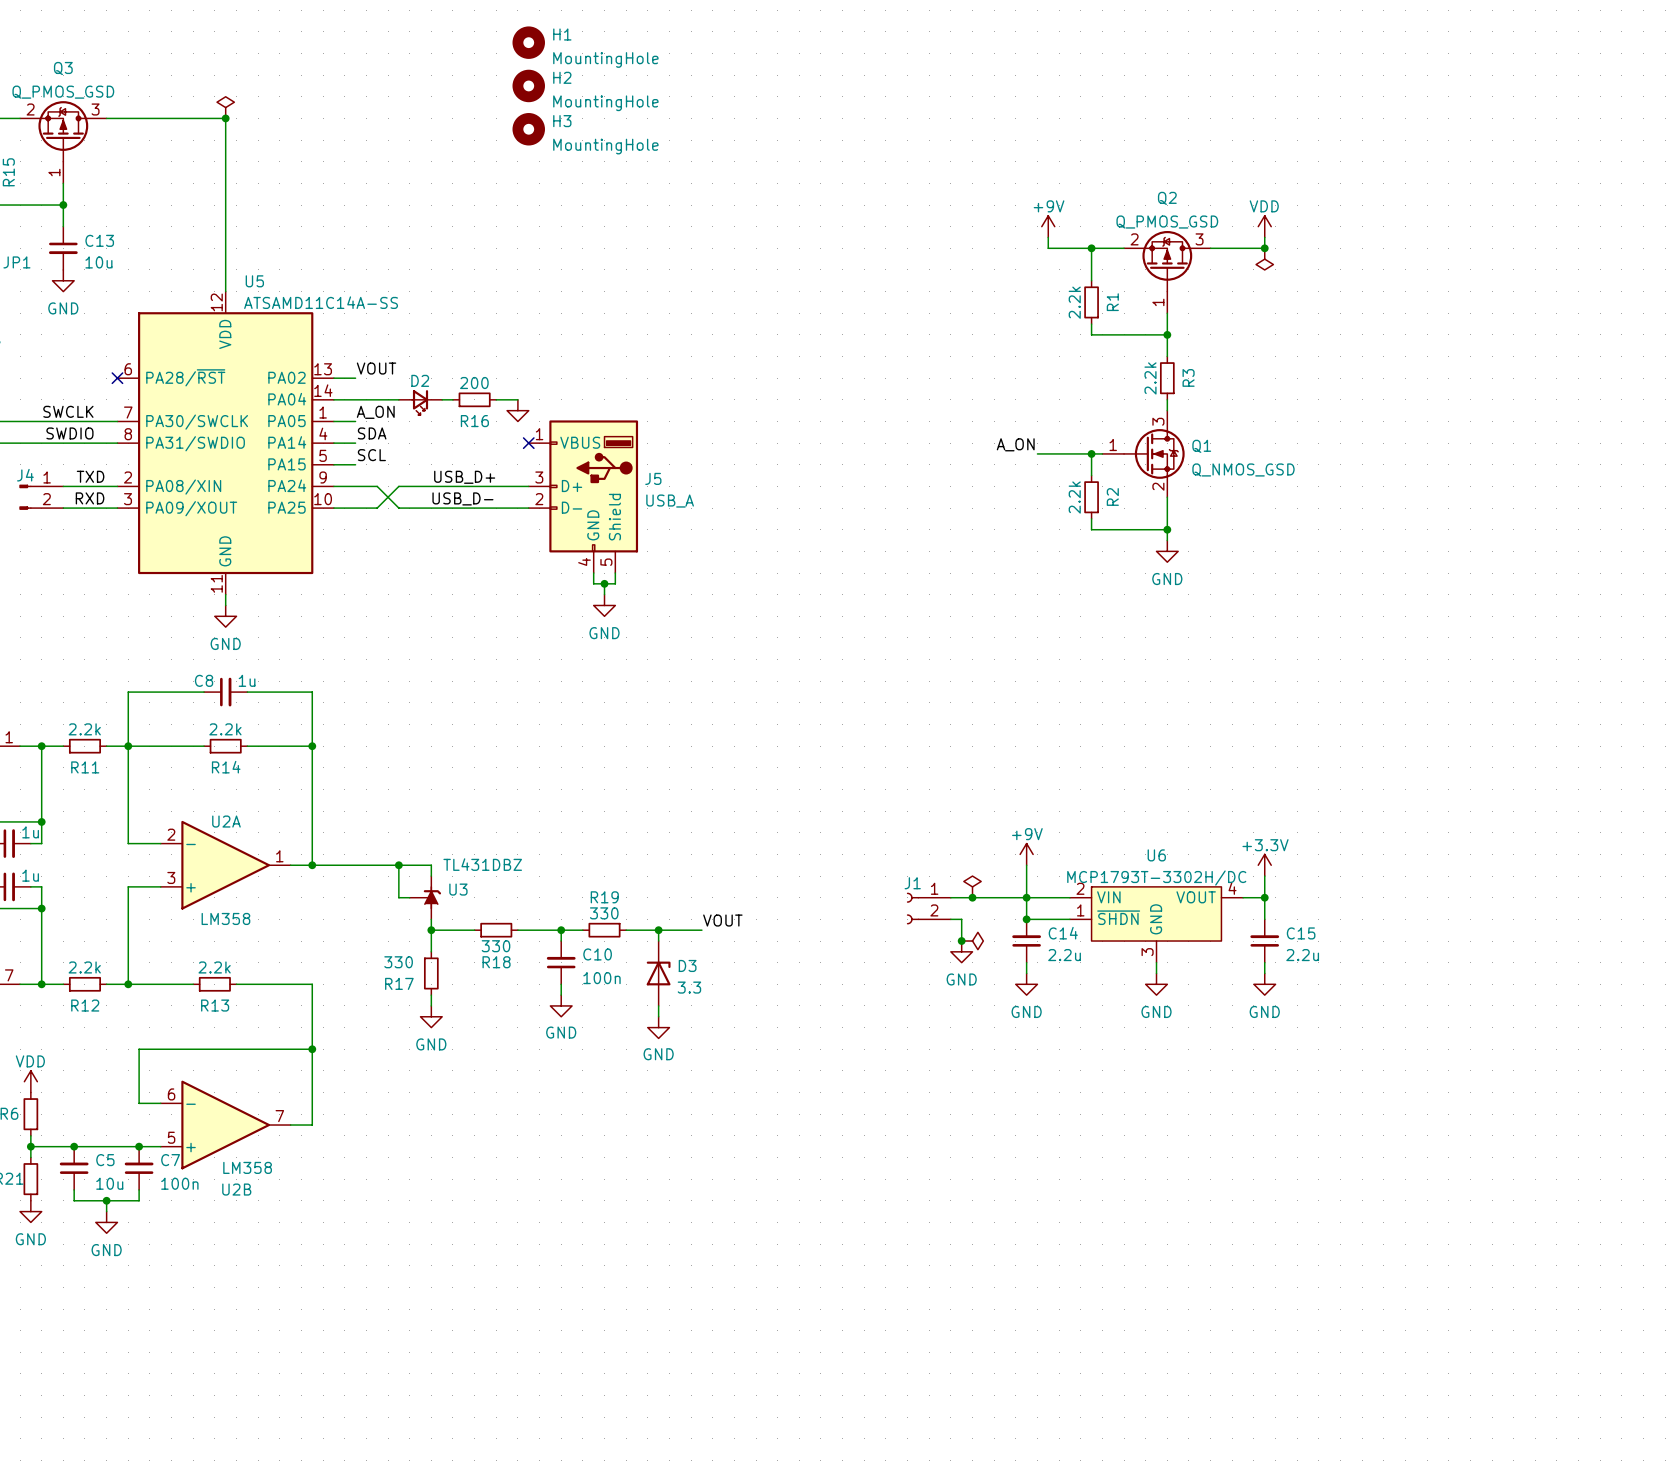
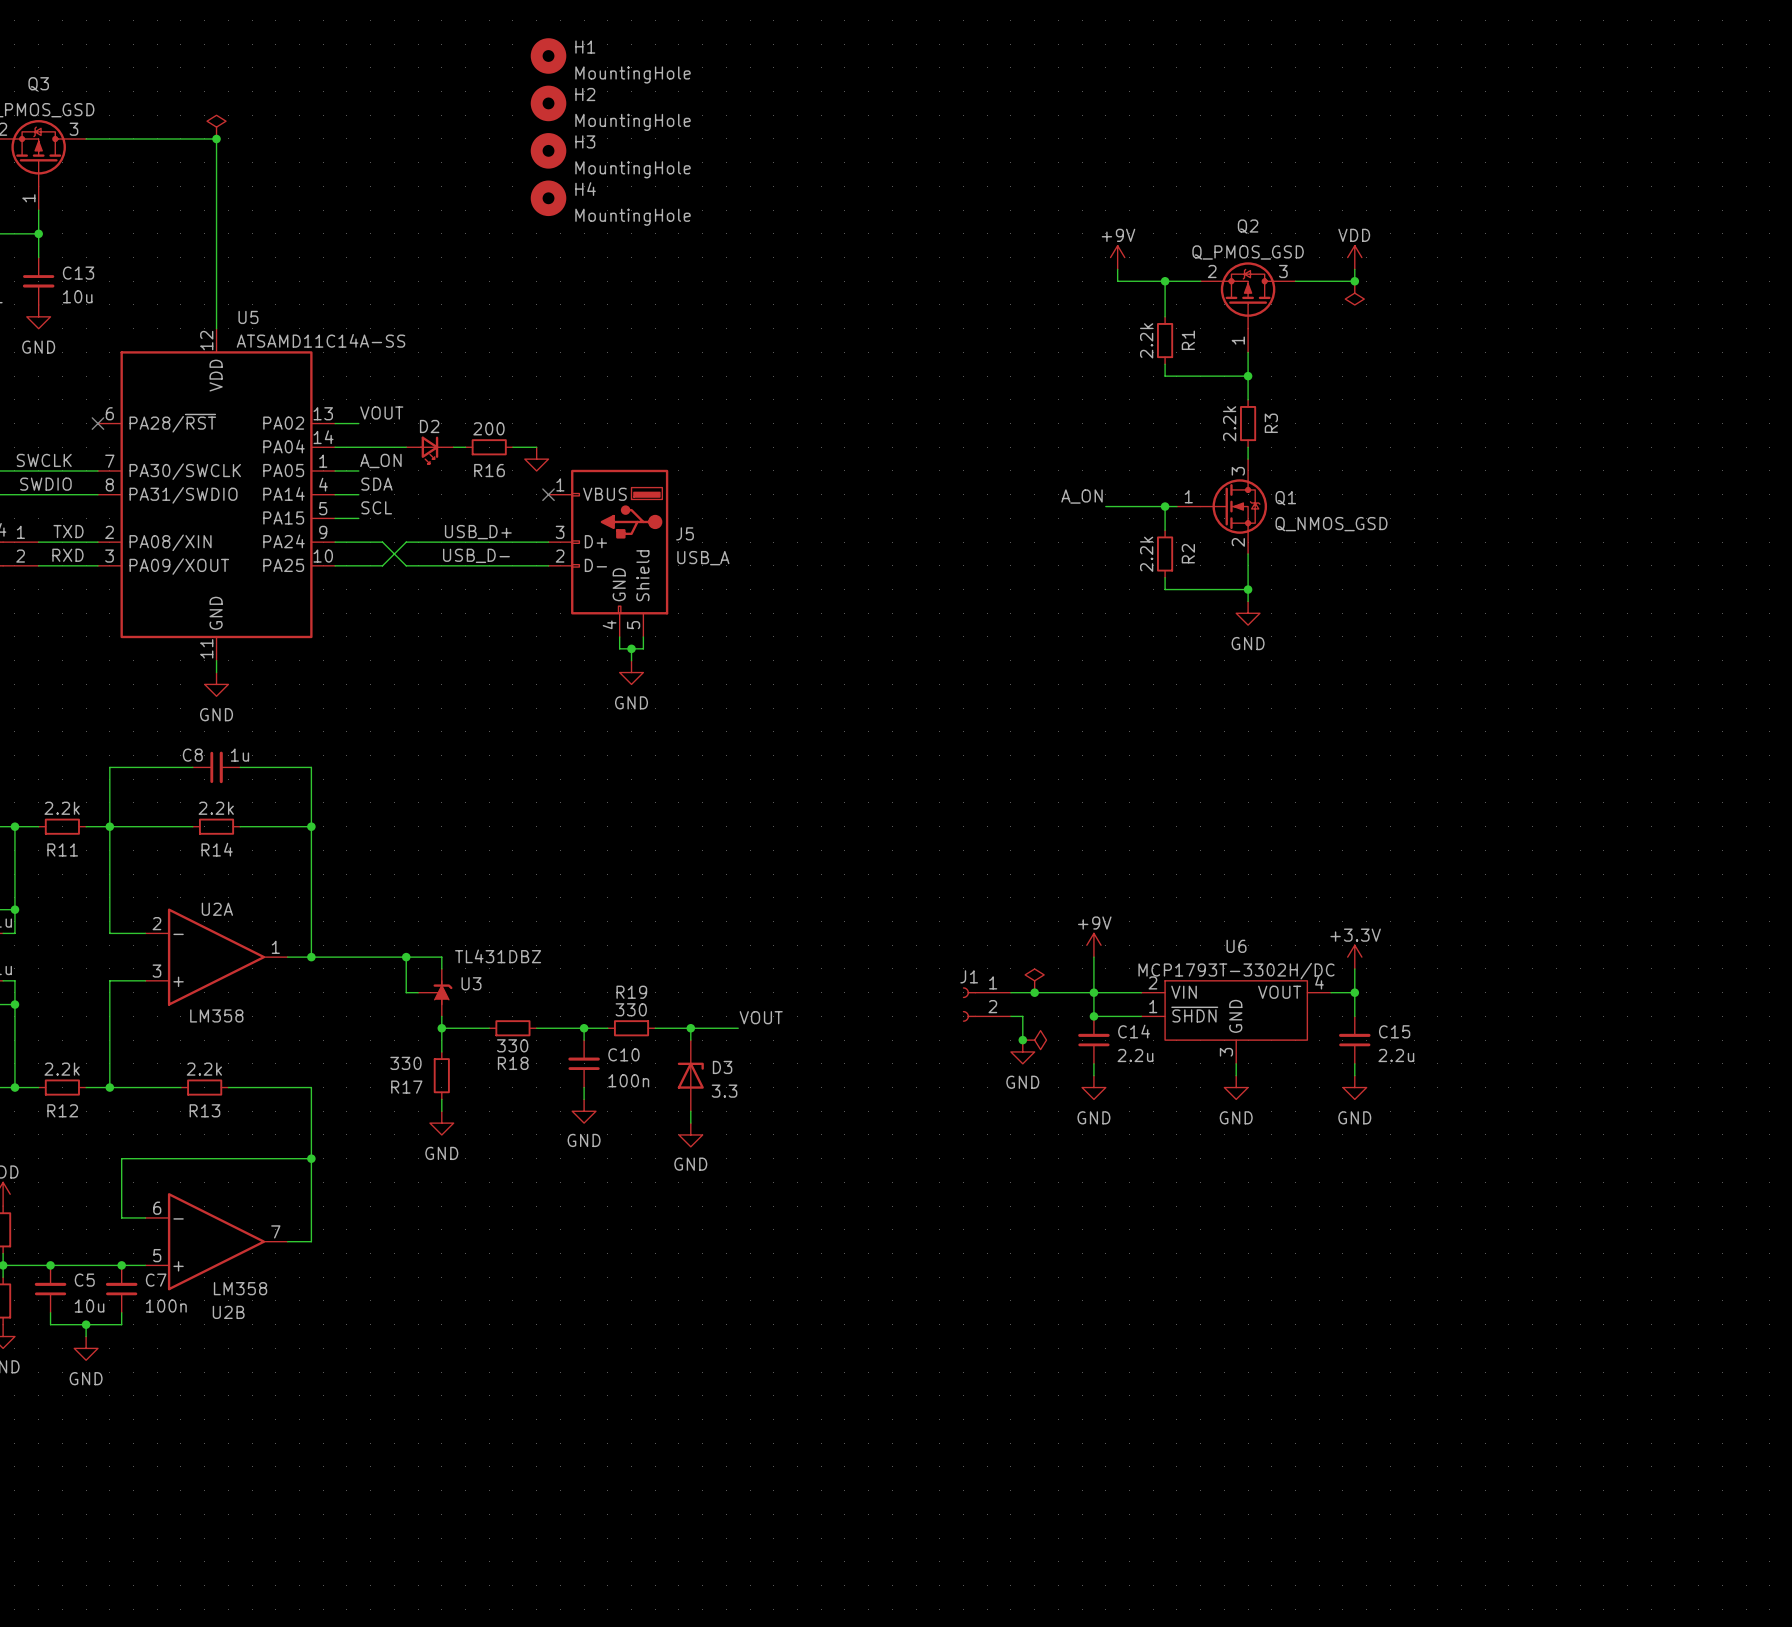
H4: none -> MountingHole (548, 198)

